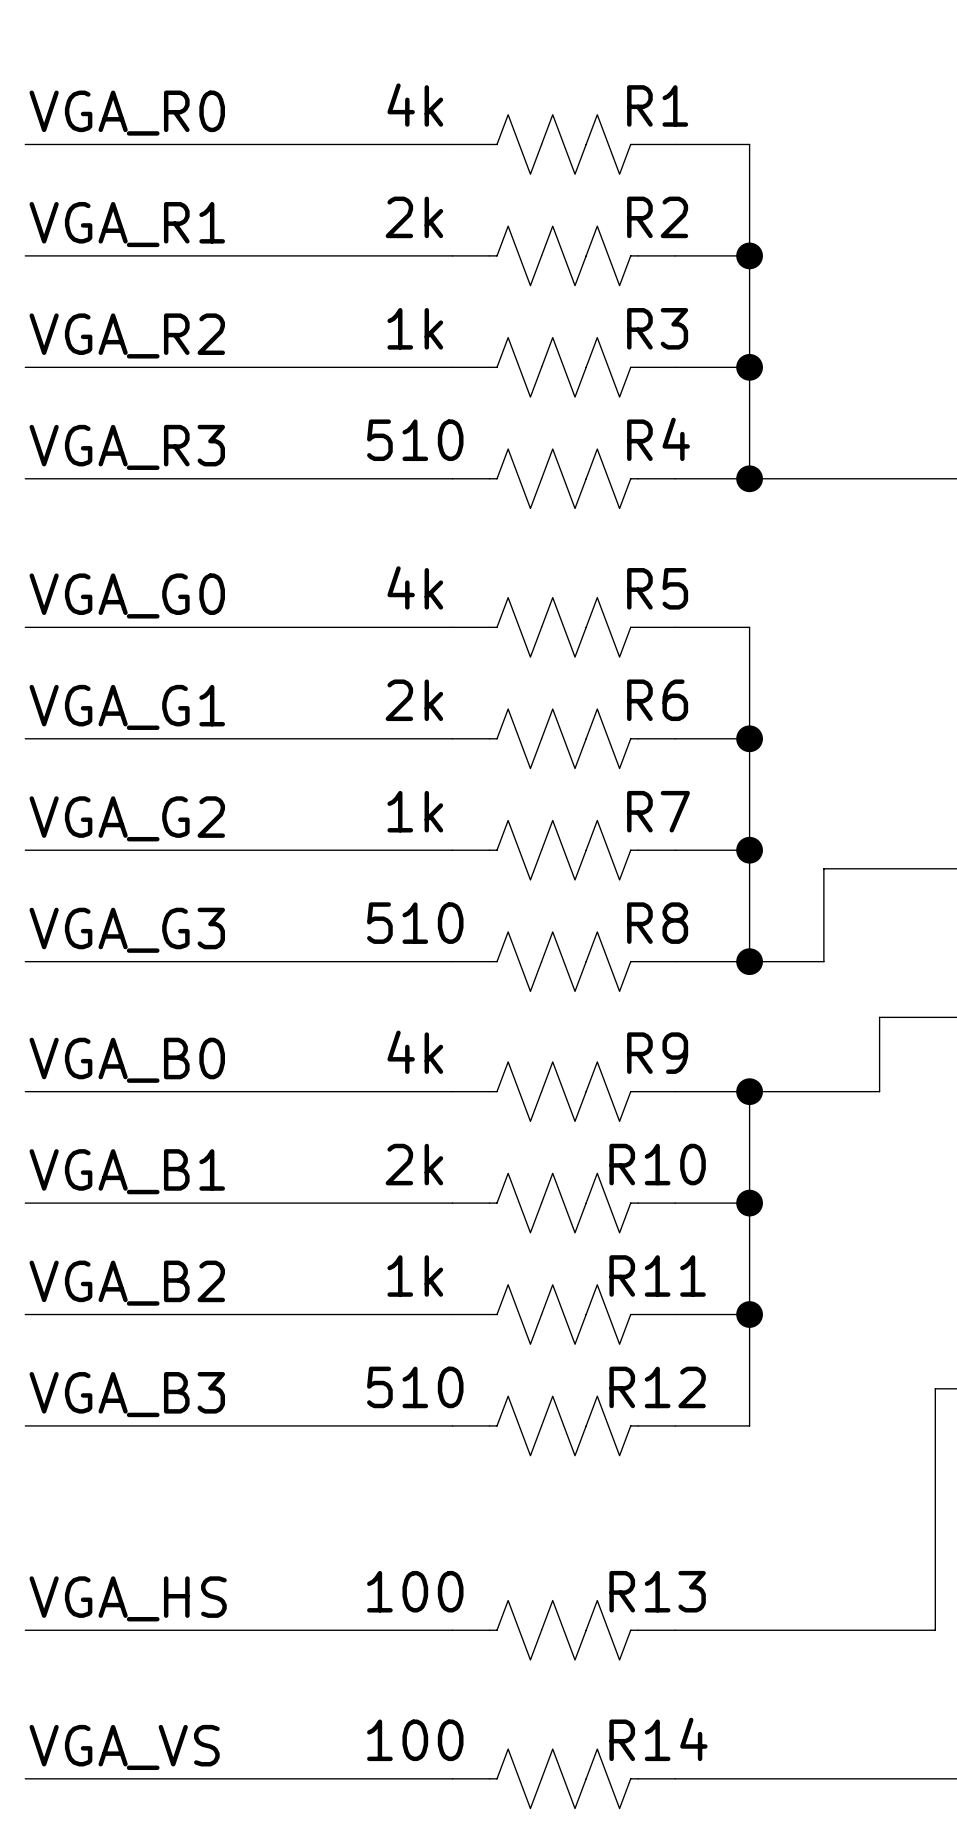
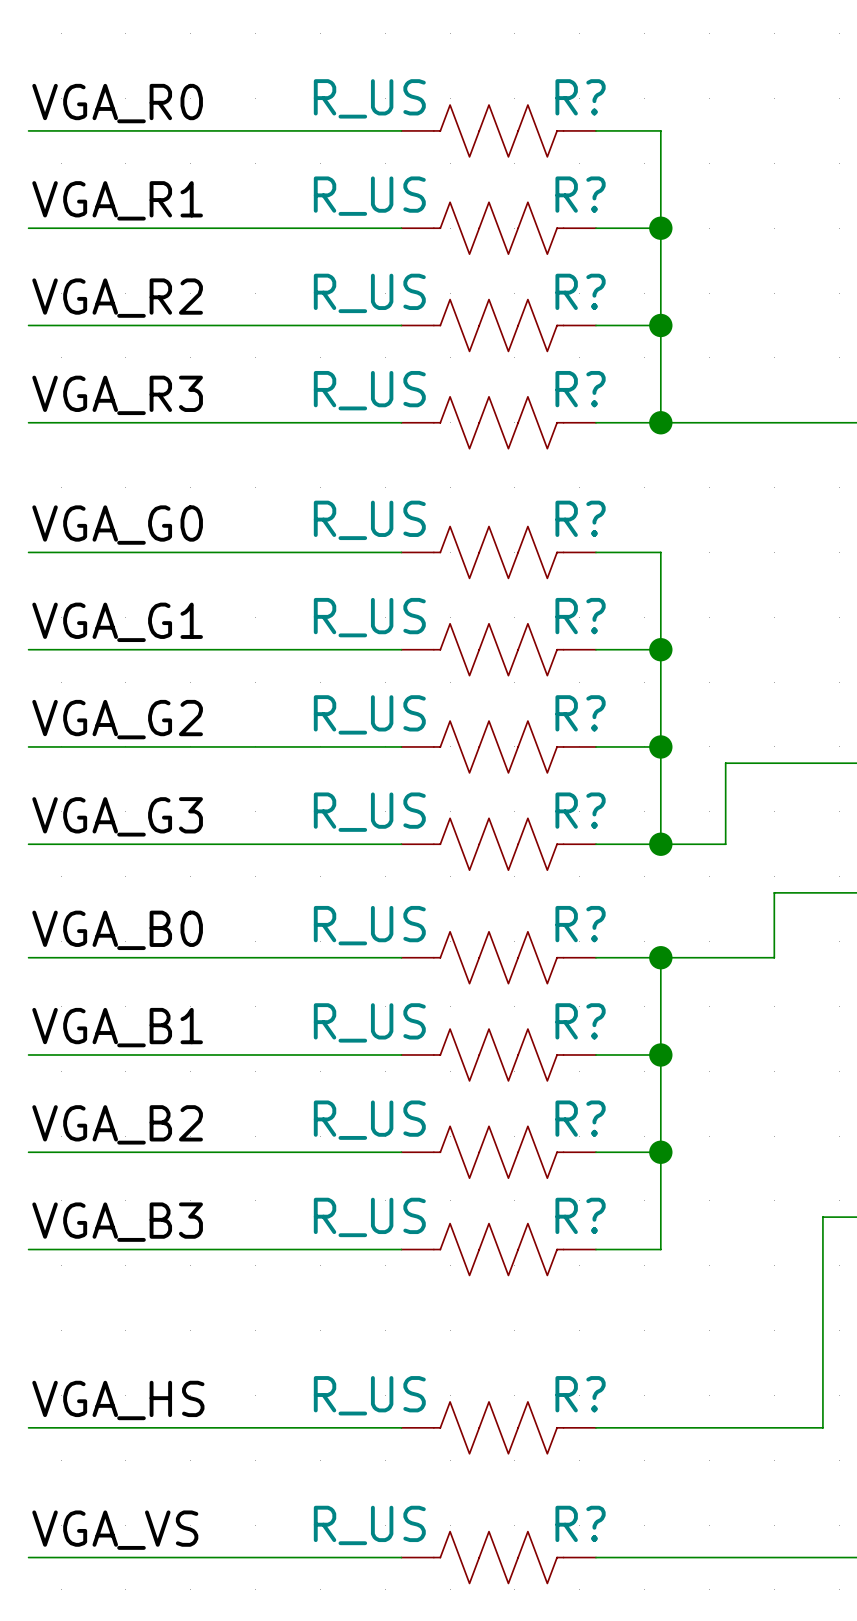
R1 value: 4k (415, 105) -> R_US (369, 98)
R1 name: R1 (657, 105) -> R? (580, 97)
R2 value: 2k (414, 217) -> R_US (369, 196)
R2 name: R2 (657, 217) -> R? (580, 194)
R3 value: 1k (415, 328) -> R_US (369, 293)
R3 name: R3 (657, 328) -> R? (580, 291)
R4 name: R4 (658, 439) -> R? (580, 389)
R4 value: 510 (415, 440) -> R_US (369, 390)
R5 value: 4k (415, 587) -> R_US (369, 520)
R5 name: R5 (657, 588) -> R? (580, 518)
R6 value: 2k (414, 700) -> R_US (369, 617)
R6 name: R6 (657, 700) -> R? (580, 616)
R7 value: 1k (415, 811) -> R_US (369, 714)
R7 name: R7 (658, 811) -> R? (580, 713)
R8 value: 510 (415, 923) -> R_US (369, 812)
R8 name: R8 (657, 923) -> R? (580, 810)
R9 value: 4k (415, 1052) -> R_US (369, 925)
R9 name: R9 (657, 1053) -> R? (580, 924)
R10 value: 2k (414, 1164) -> R_US (369, 1022)
R10 name: R10 (657, 1164) -> R? (580, 1021)
R11 value: 1k (415, 1275) -> R_US (369, 1120)
R11 name: R11 (657, 1275) -> R? (580, 1118)
R12 value: 510 (415, 1387) -> R_US (369, 1217)
R12 name: R12 (657, 1387) -> R? (580, 1215)
R13 value: 100 (415, 1591) -> R_US (369, 1395)
R13 name: R13 (657, 1591) -> R? (580, 1394)
R14 name: R14 (658, 1739) -> R? (580, 1523)
R14 value: 100 (415, 1740) -> R_US (369, 1525)

